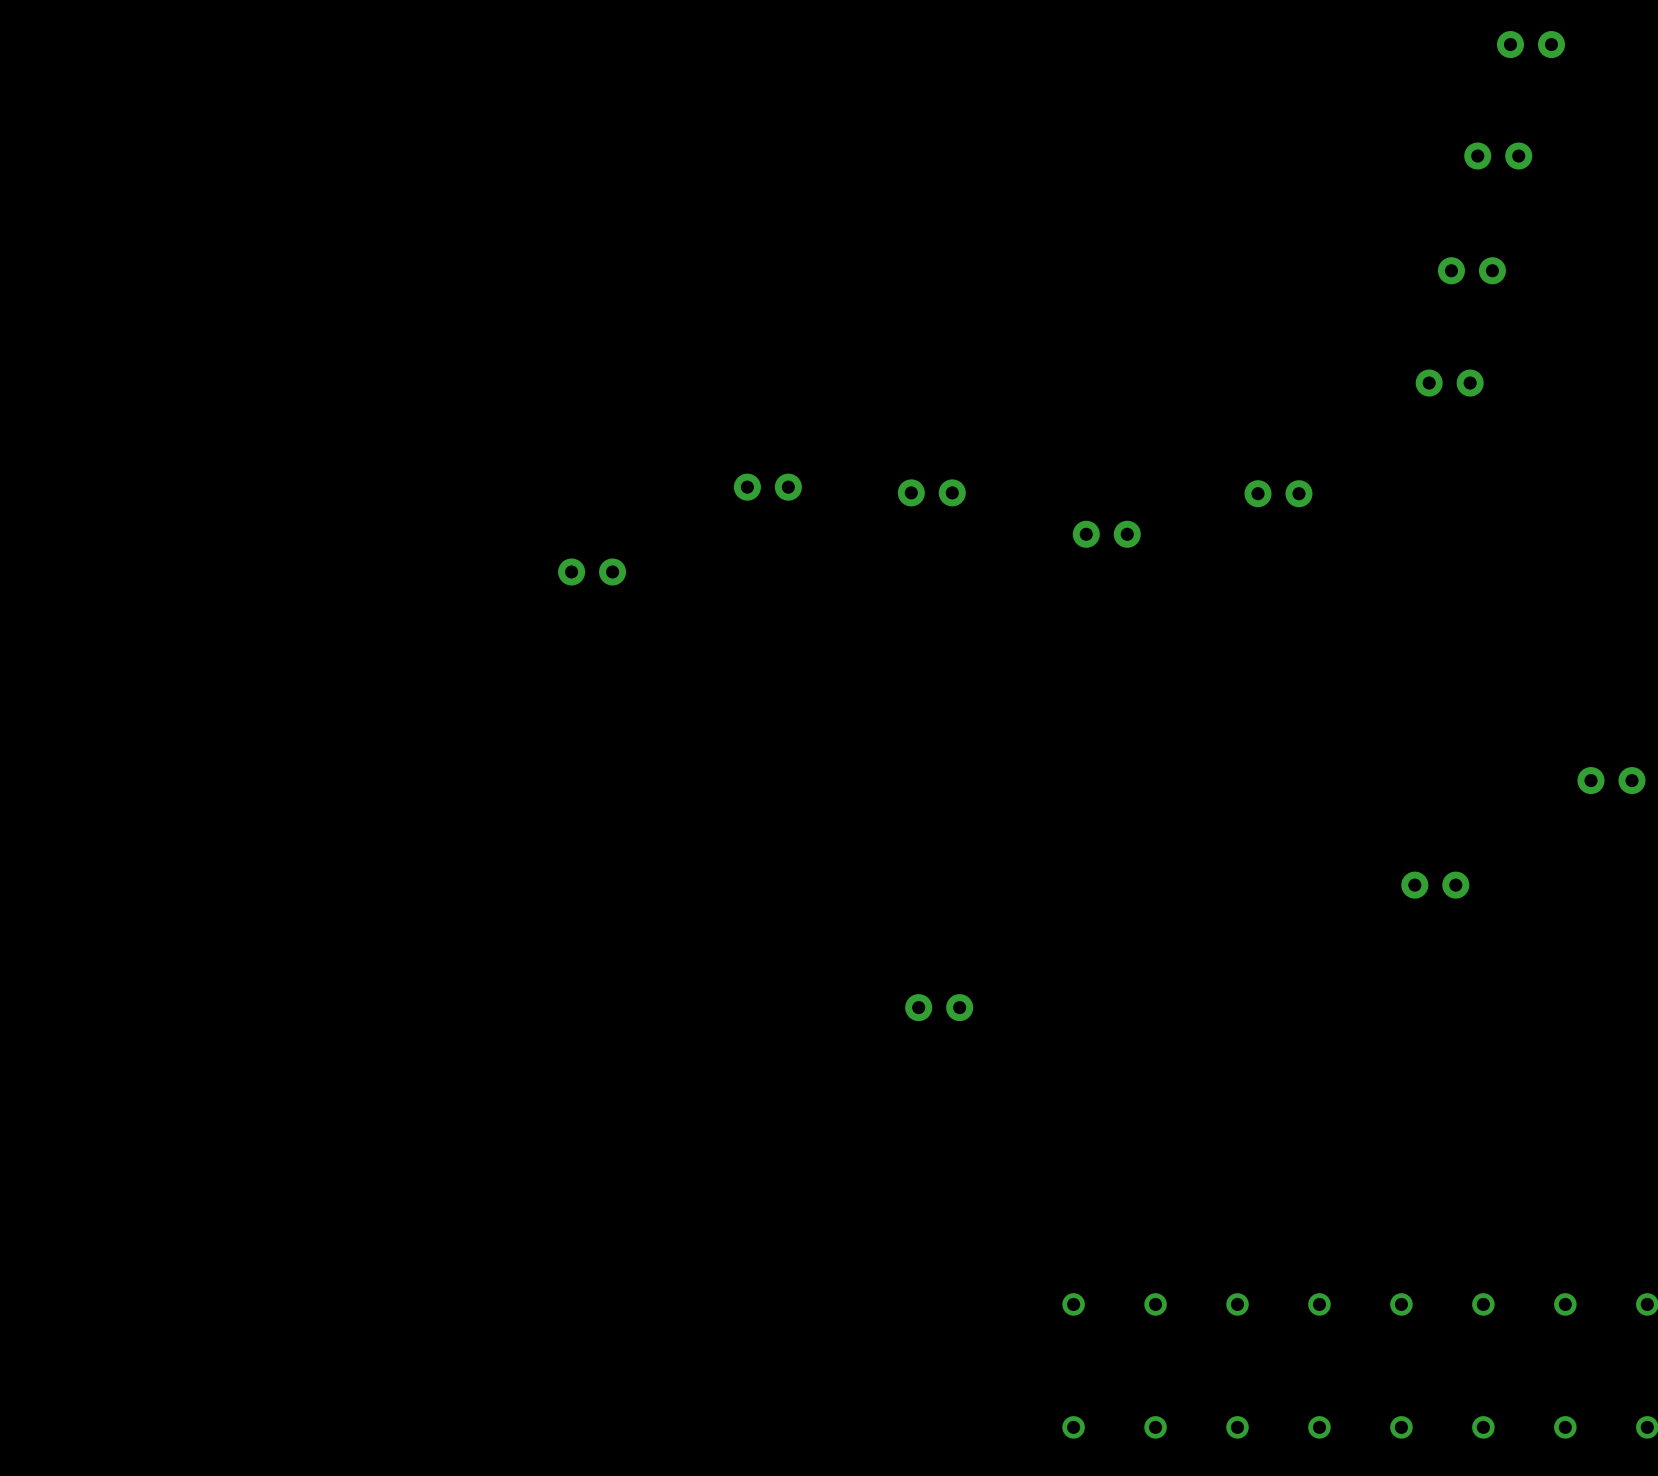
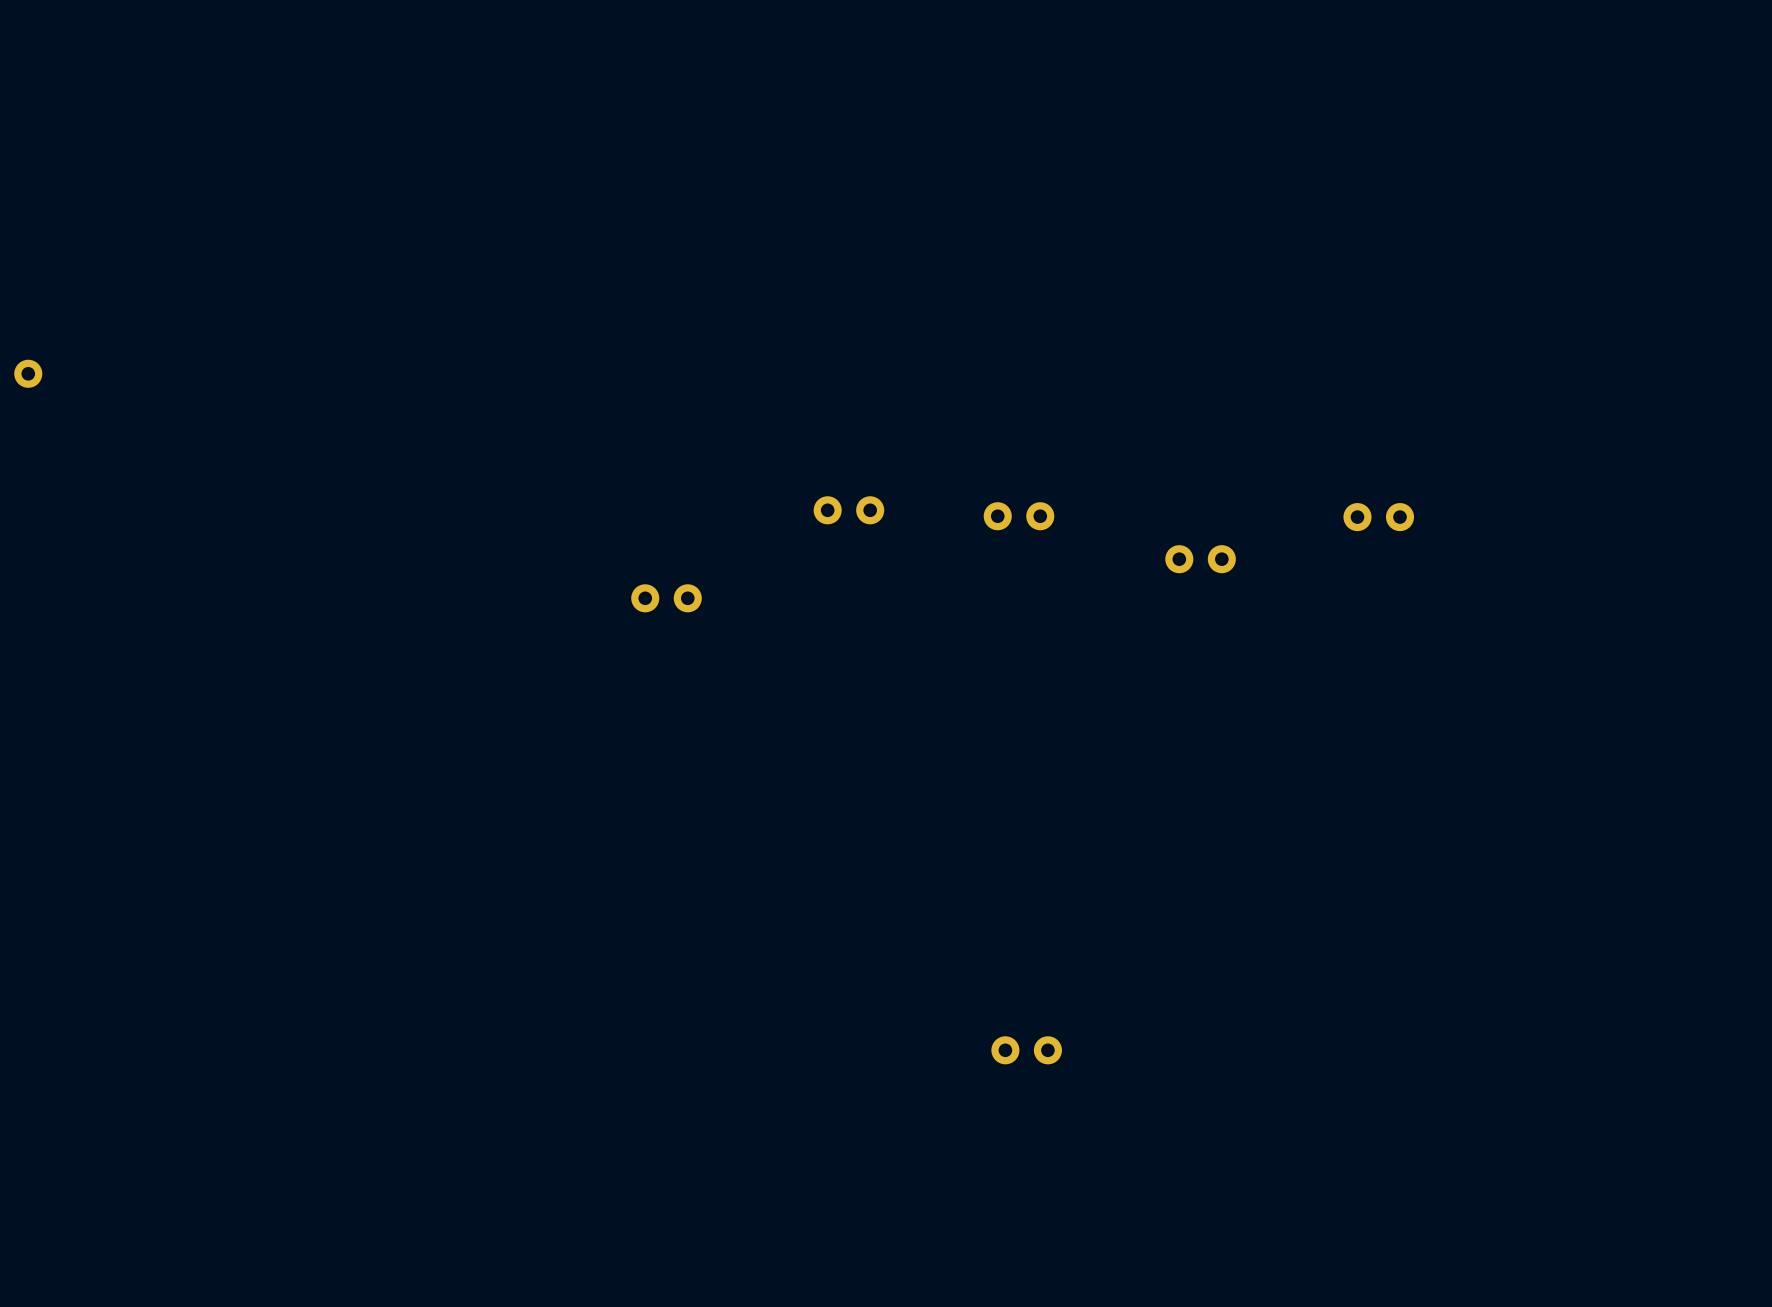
part: (1530, 44) -> none
part: (1498, 156) -> none
part: (1471, 270) -> none
part: (1449, 383) -> none
part: (1611, 780) -> none
part: (1435, 885) -> none

